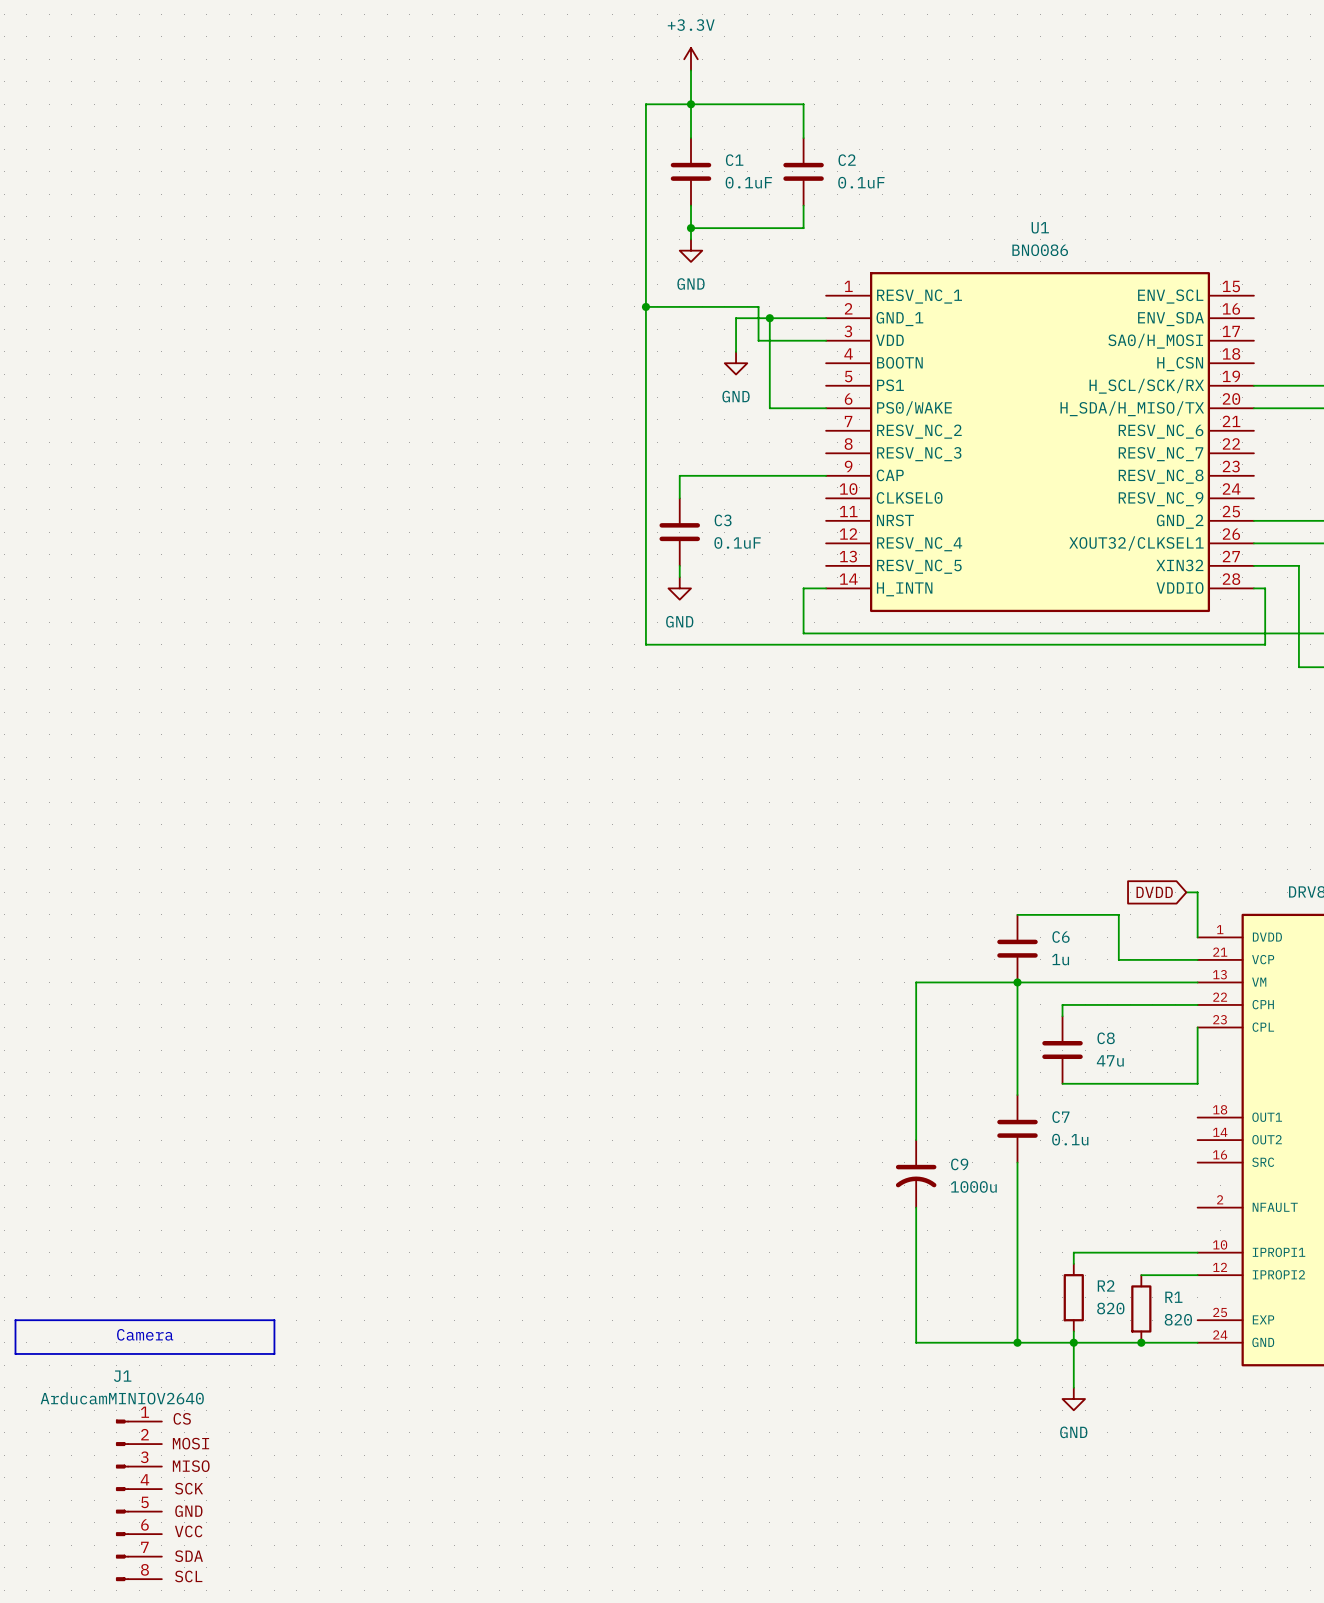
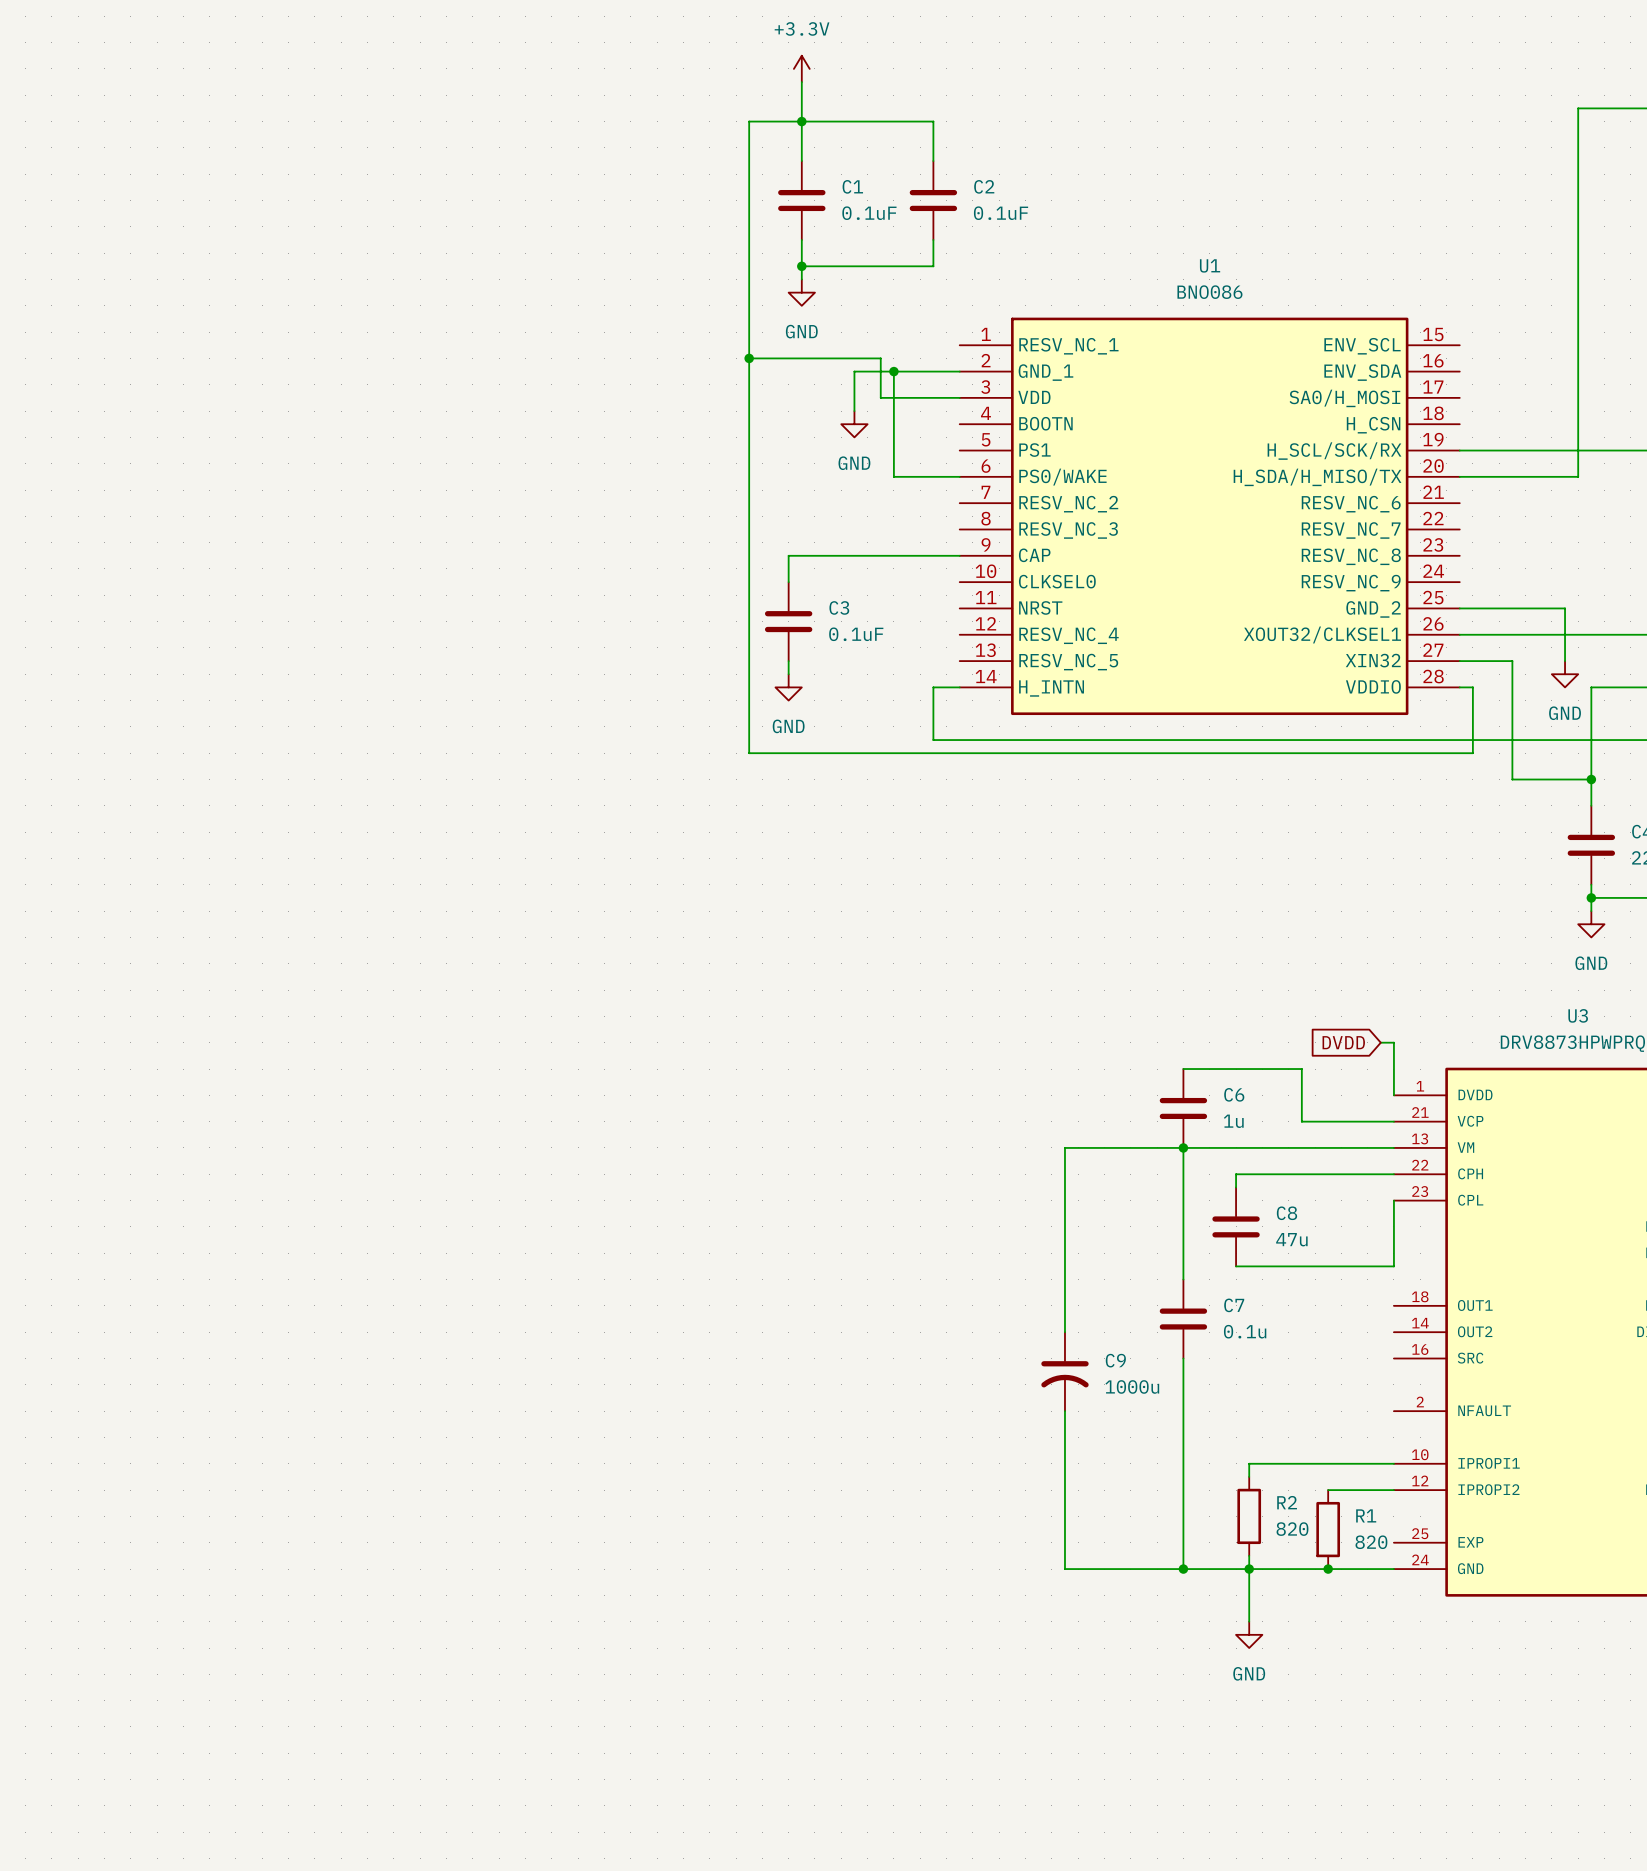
line: (15, 1320) (274, 1320) (274, 1353) (15, 1353) (15, 1320) -> none
text: Camera (145, 1334) -> none
J1: ArducamMINIOV2640 (138, 1500) -> none

